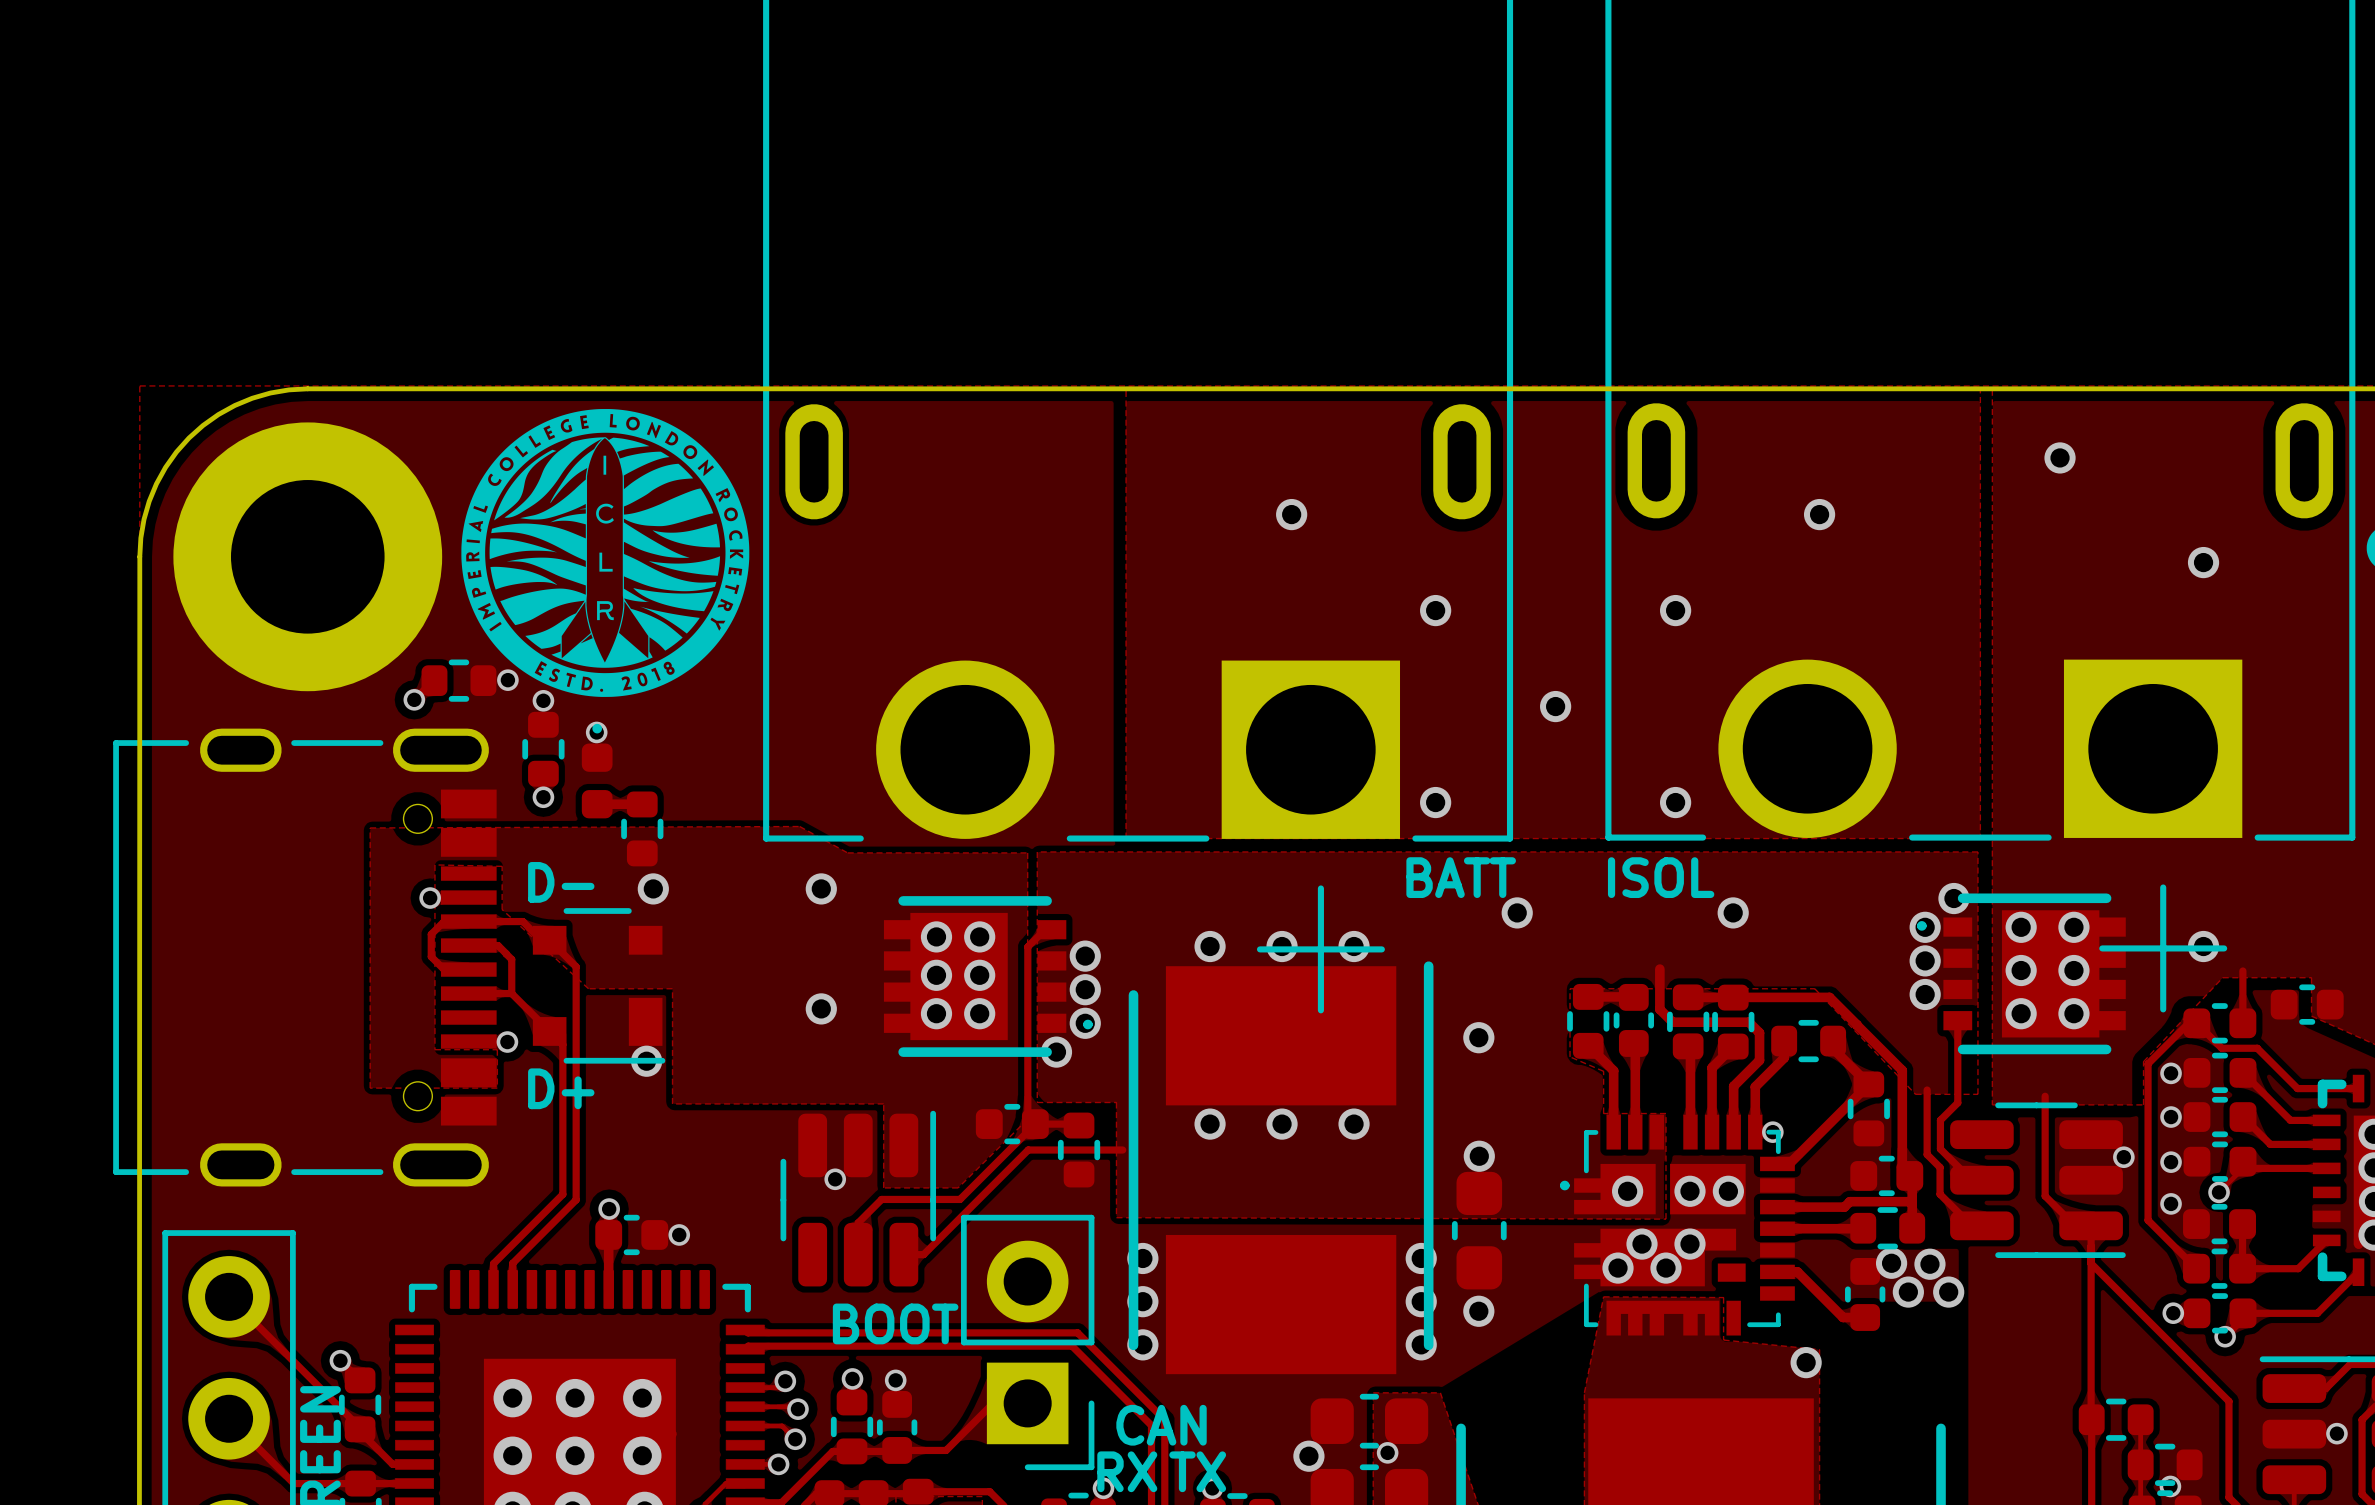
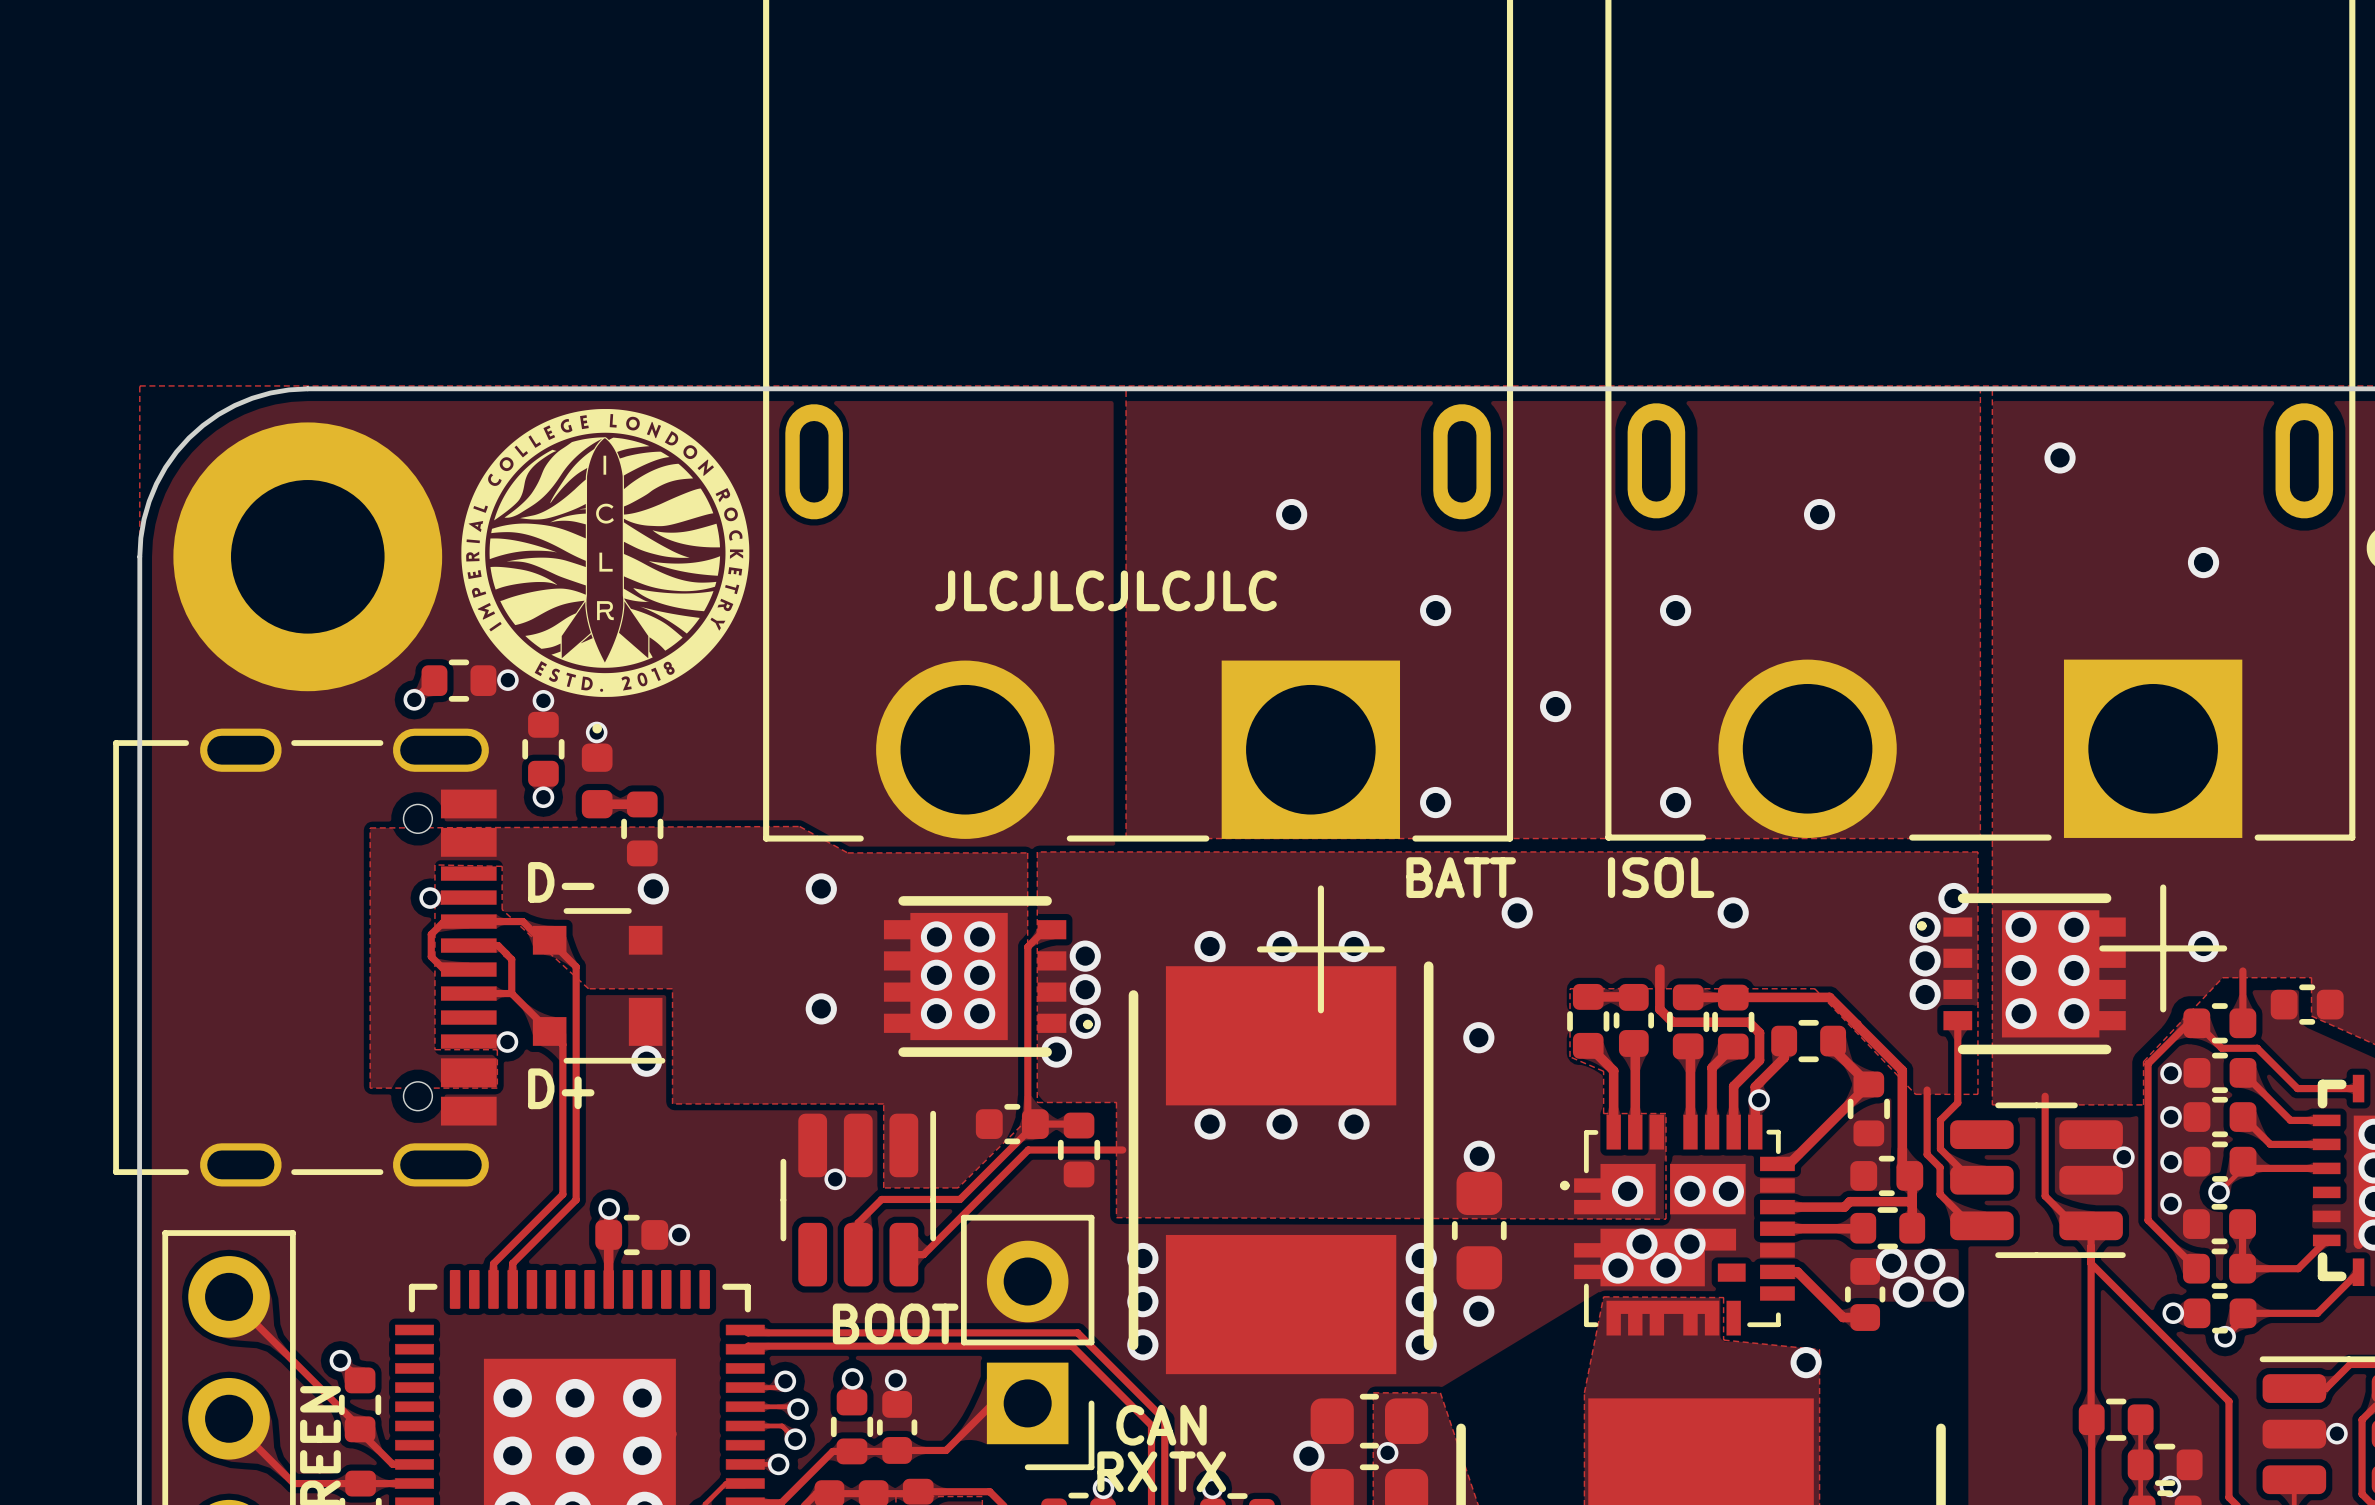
text: none -> JLCJLCJLCJLC (1106, 590)
via position: (1772, 1132) -> (1759, 1100)

